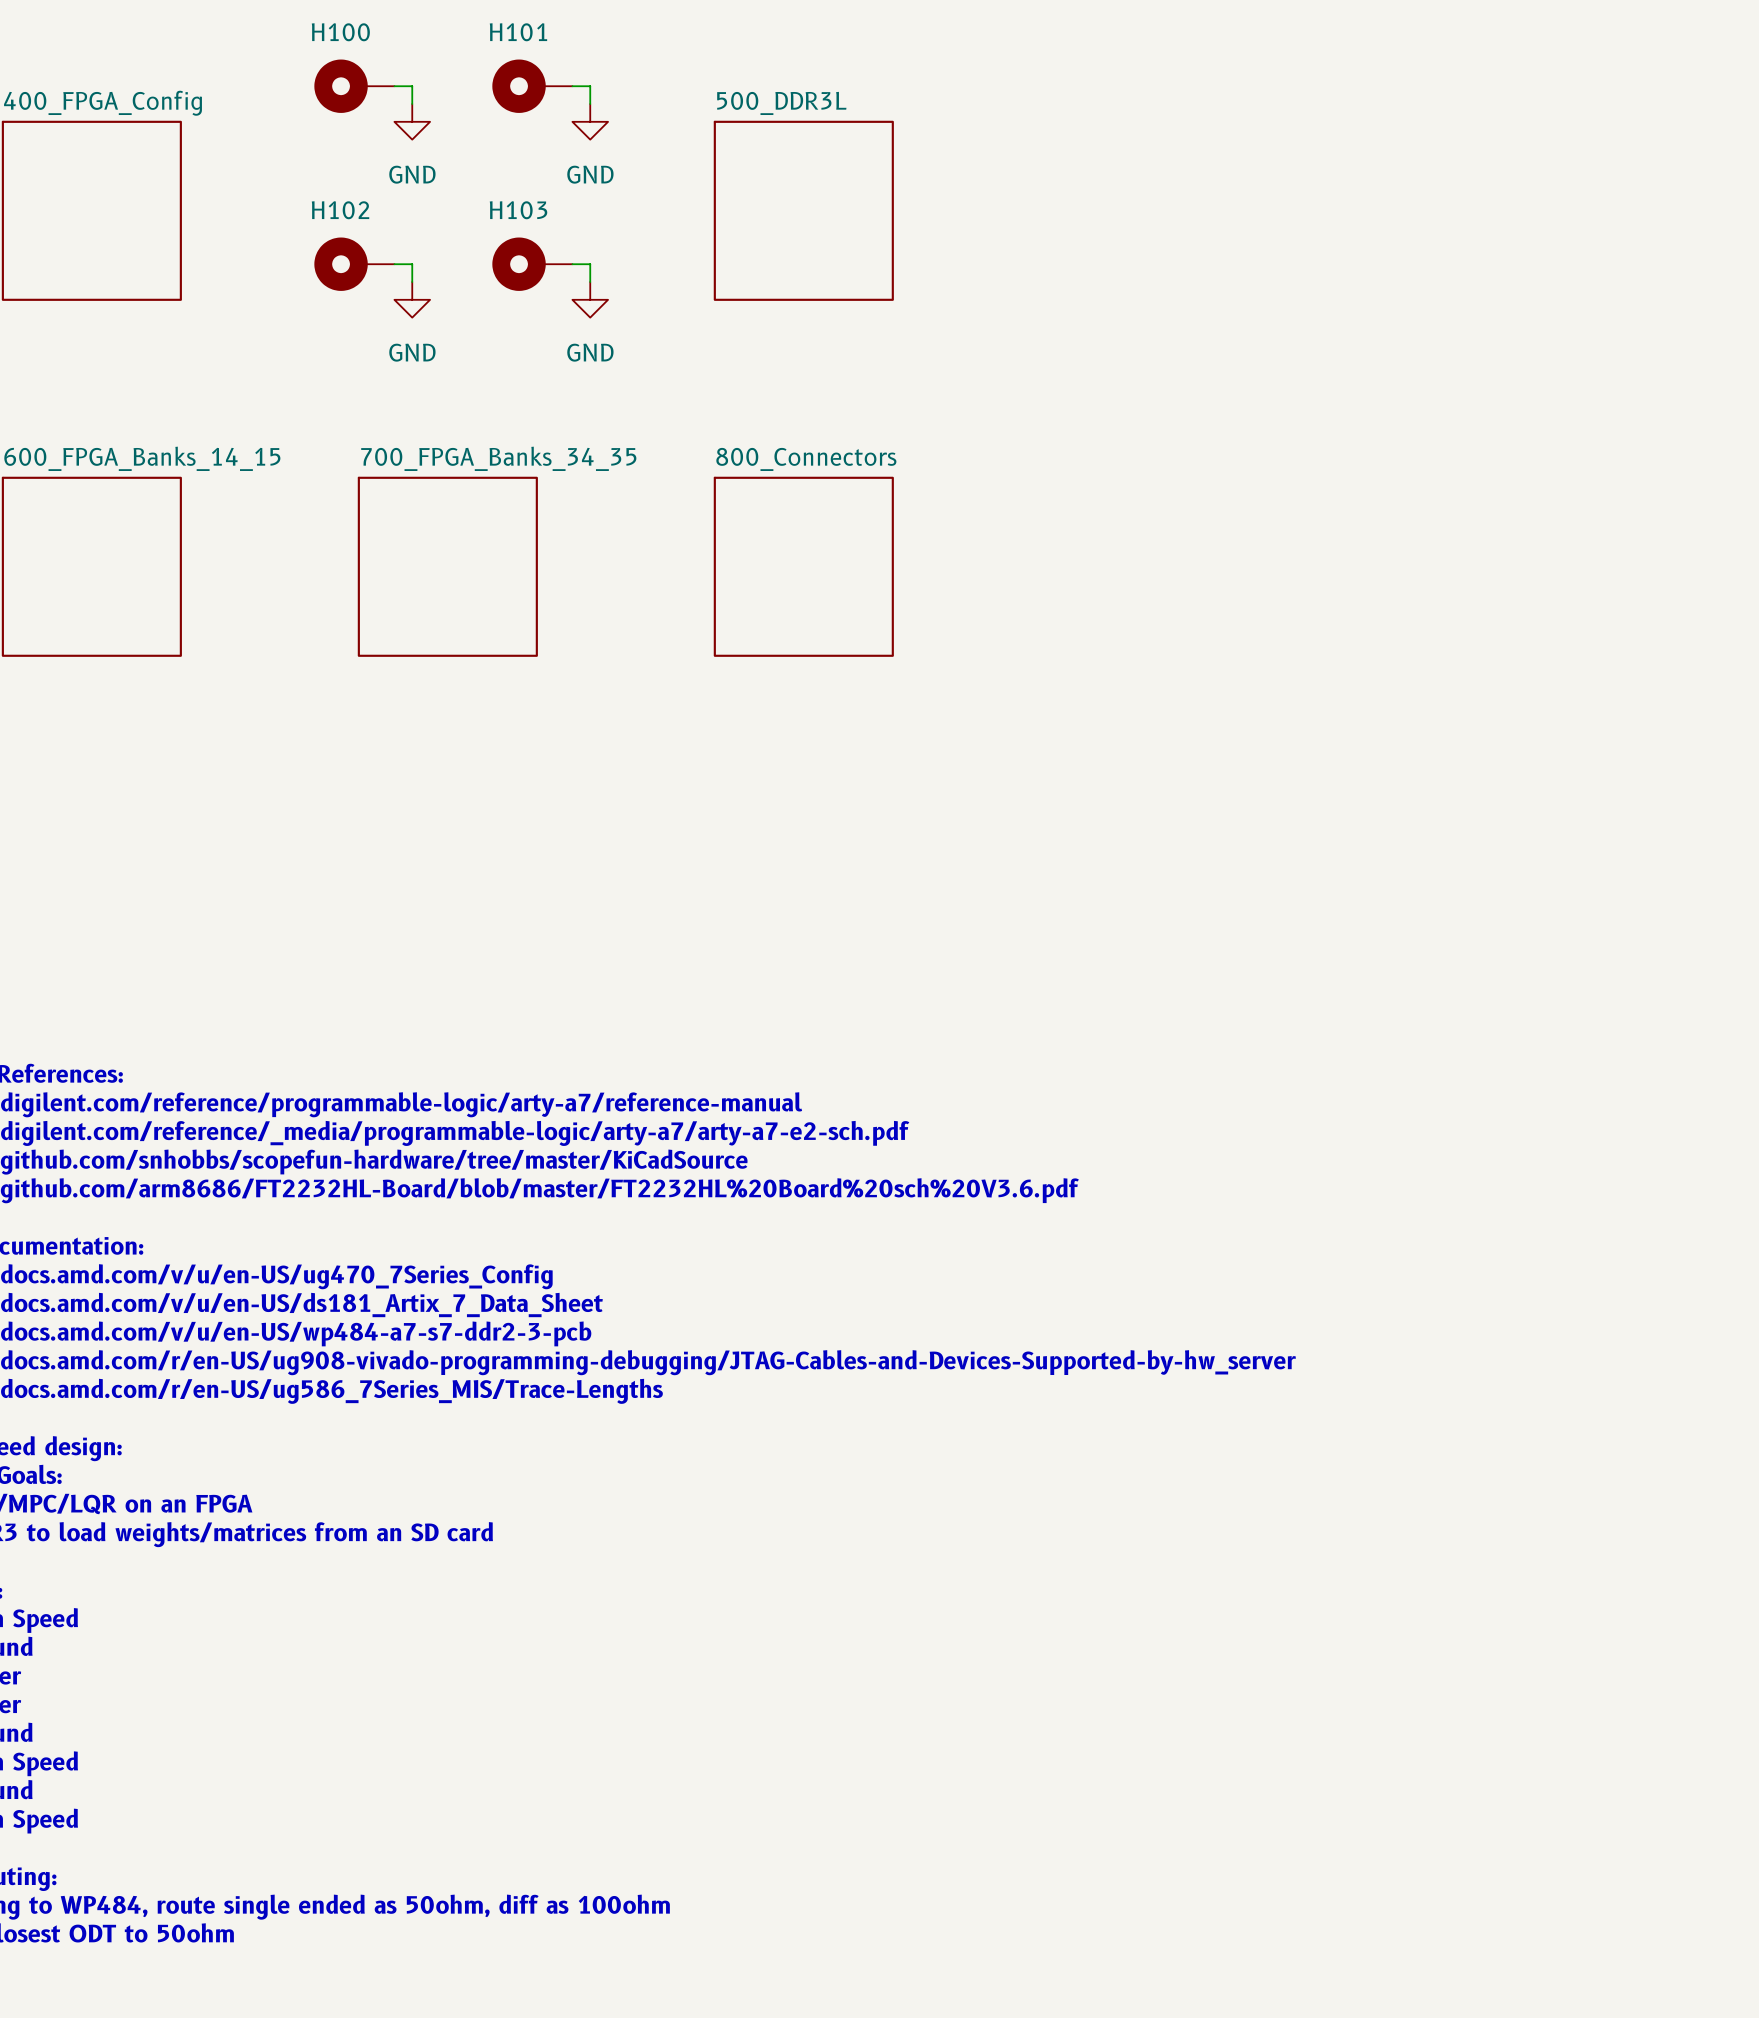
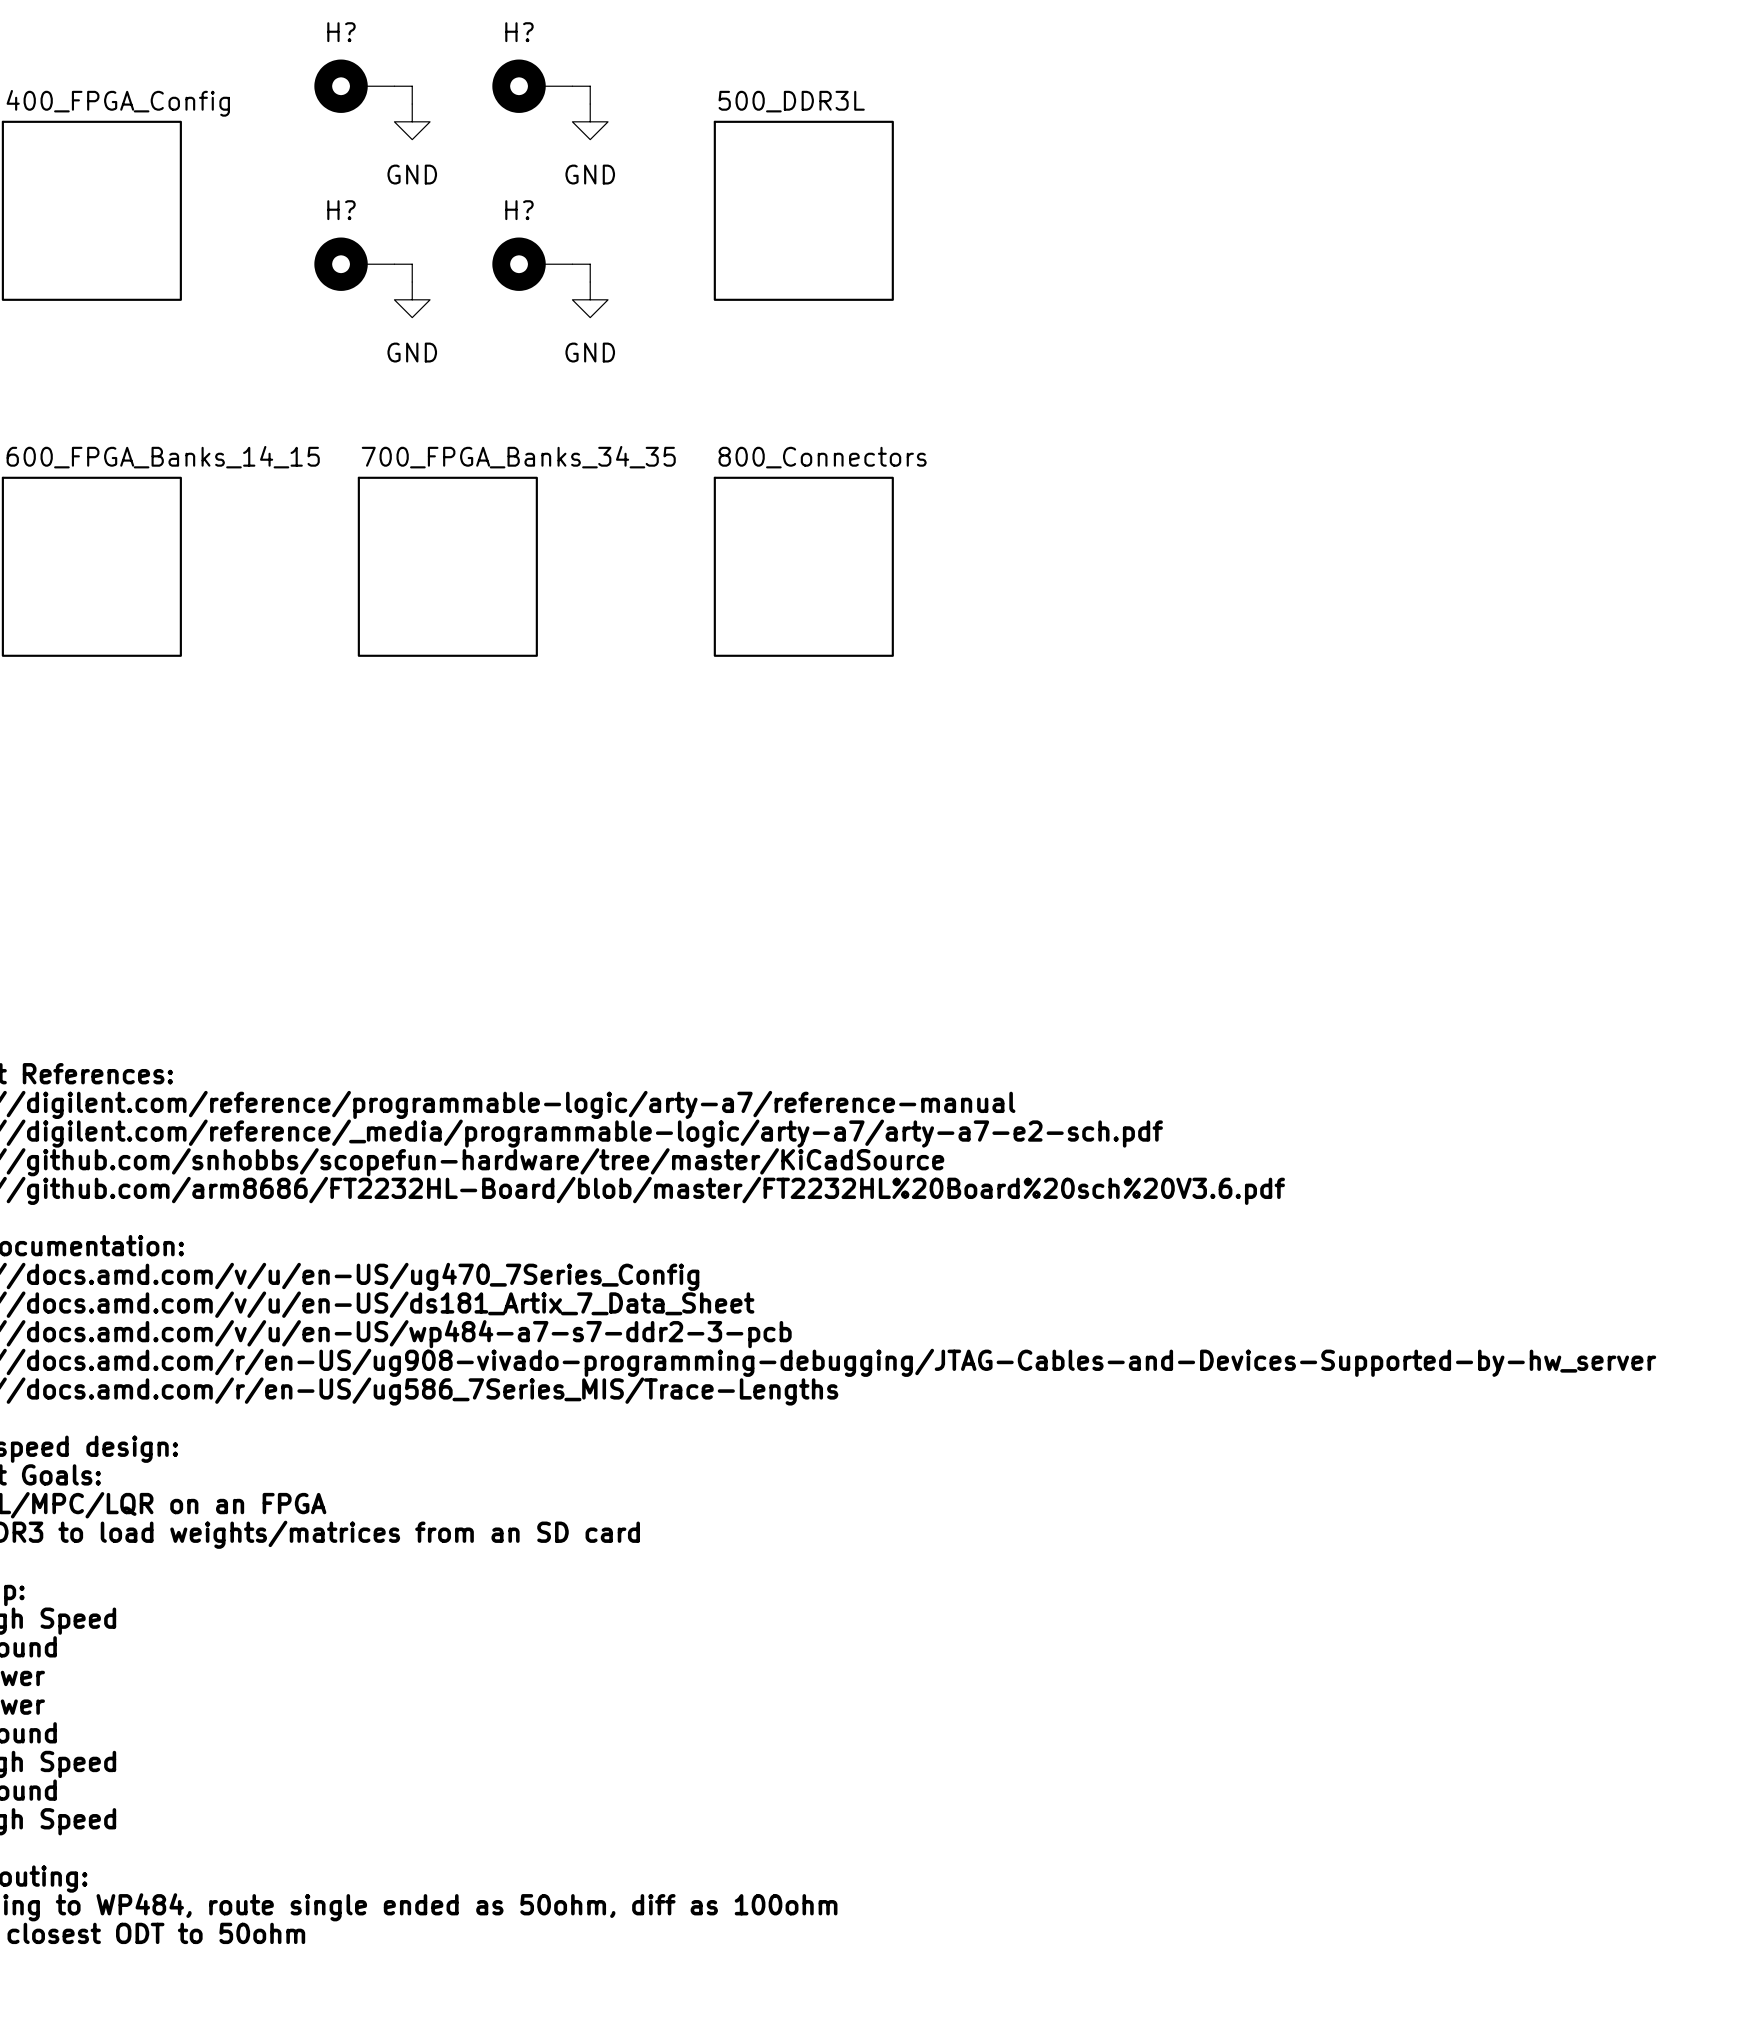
H100 name: H100 (340, 32) -> H? (341, 32)
H101 name: H101 (518, 32) -> H? (519, 32)
H102 name: H102 (340, 210) -> H? (341, 210)
H103 name: H103 (518, 210) -> H? (519, 210)

